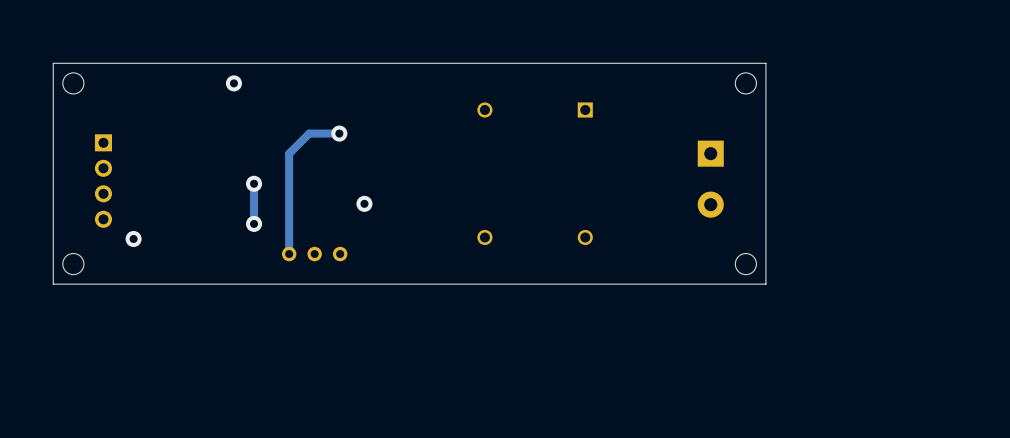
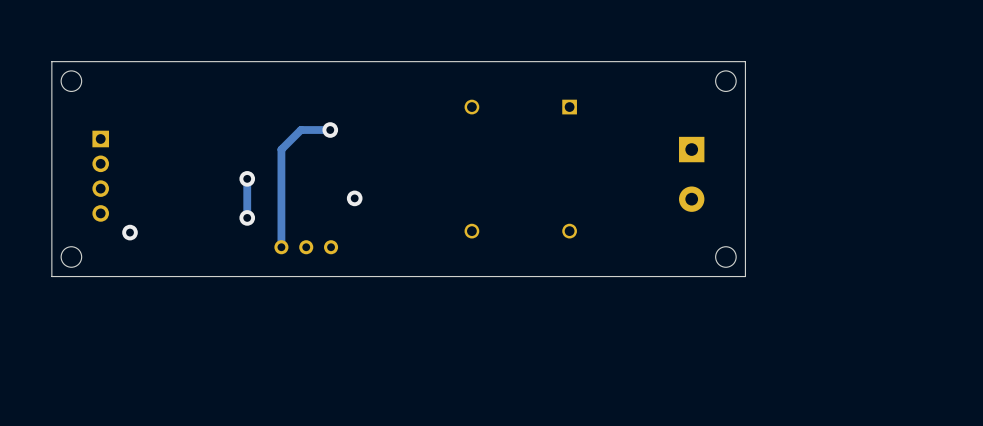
via: (233, 83) -> none

